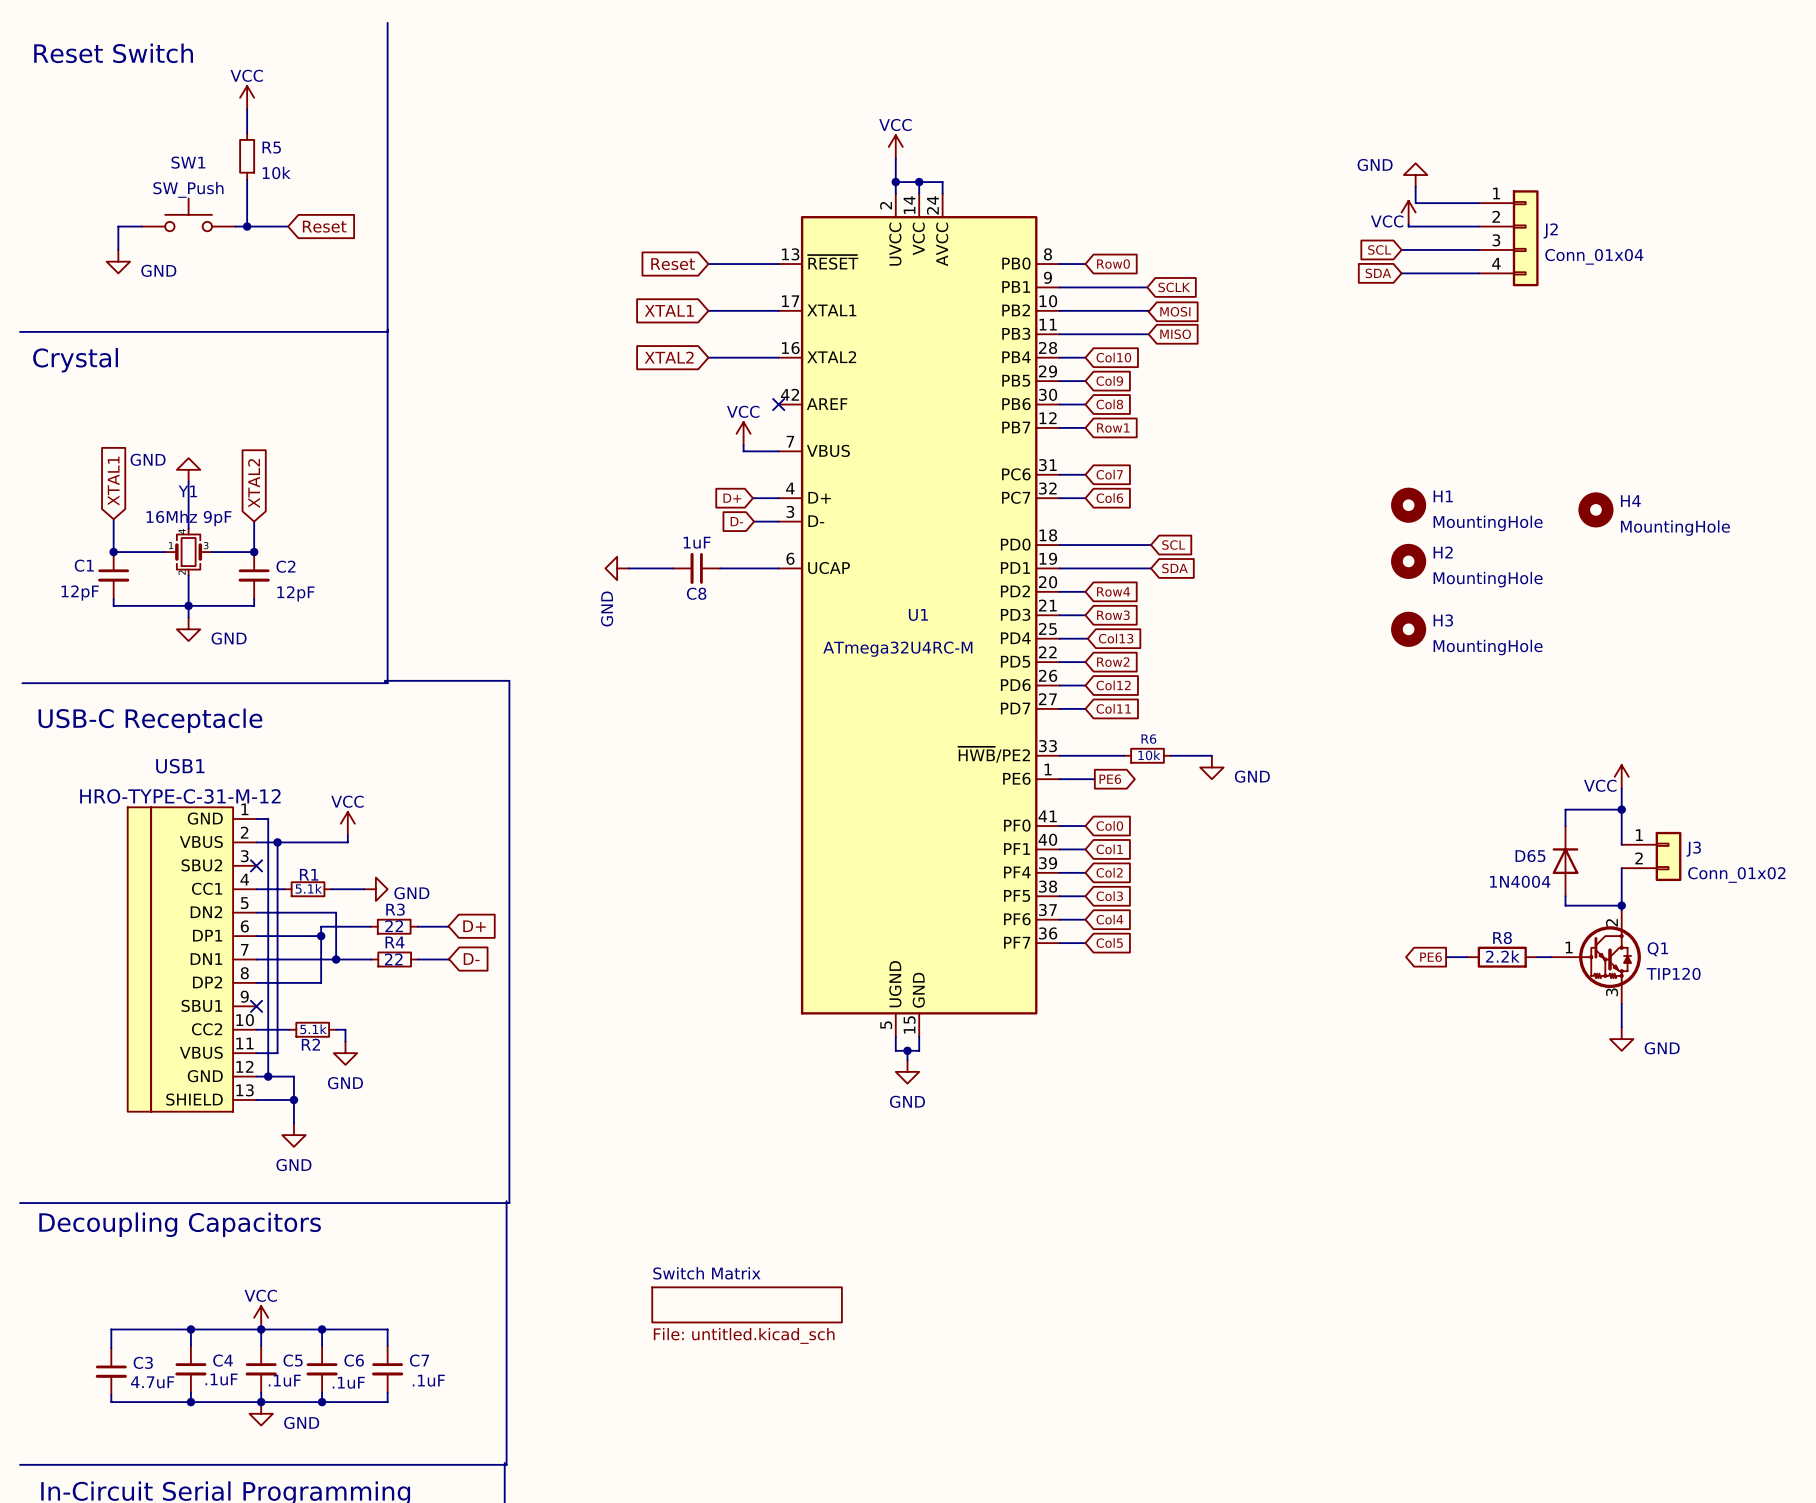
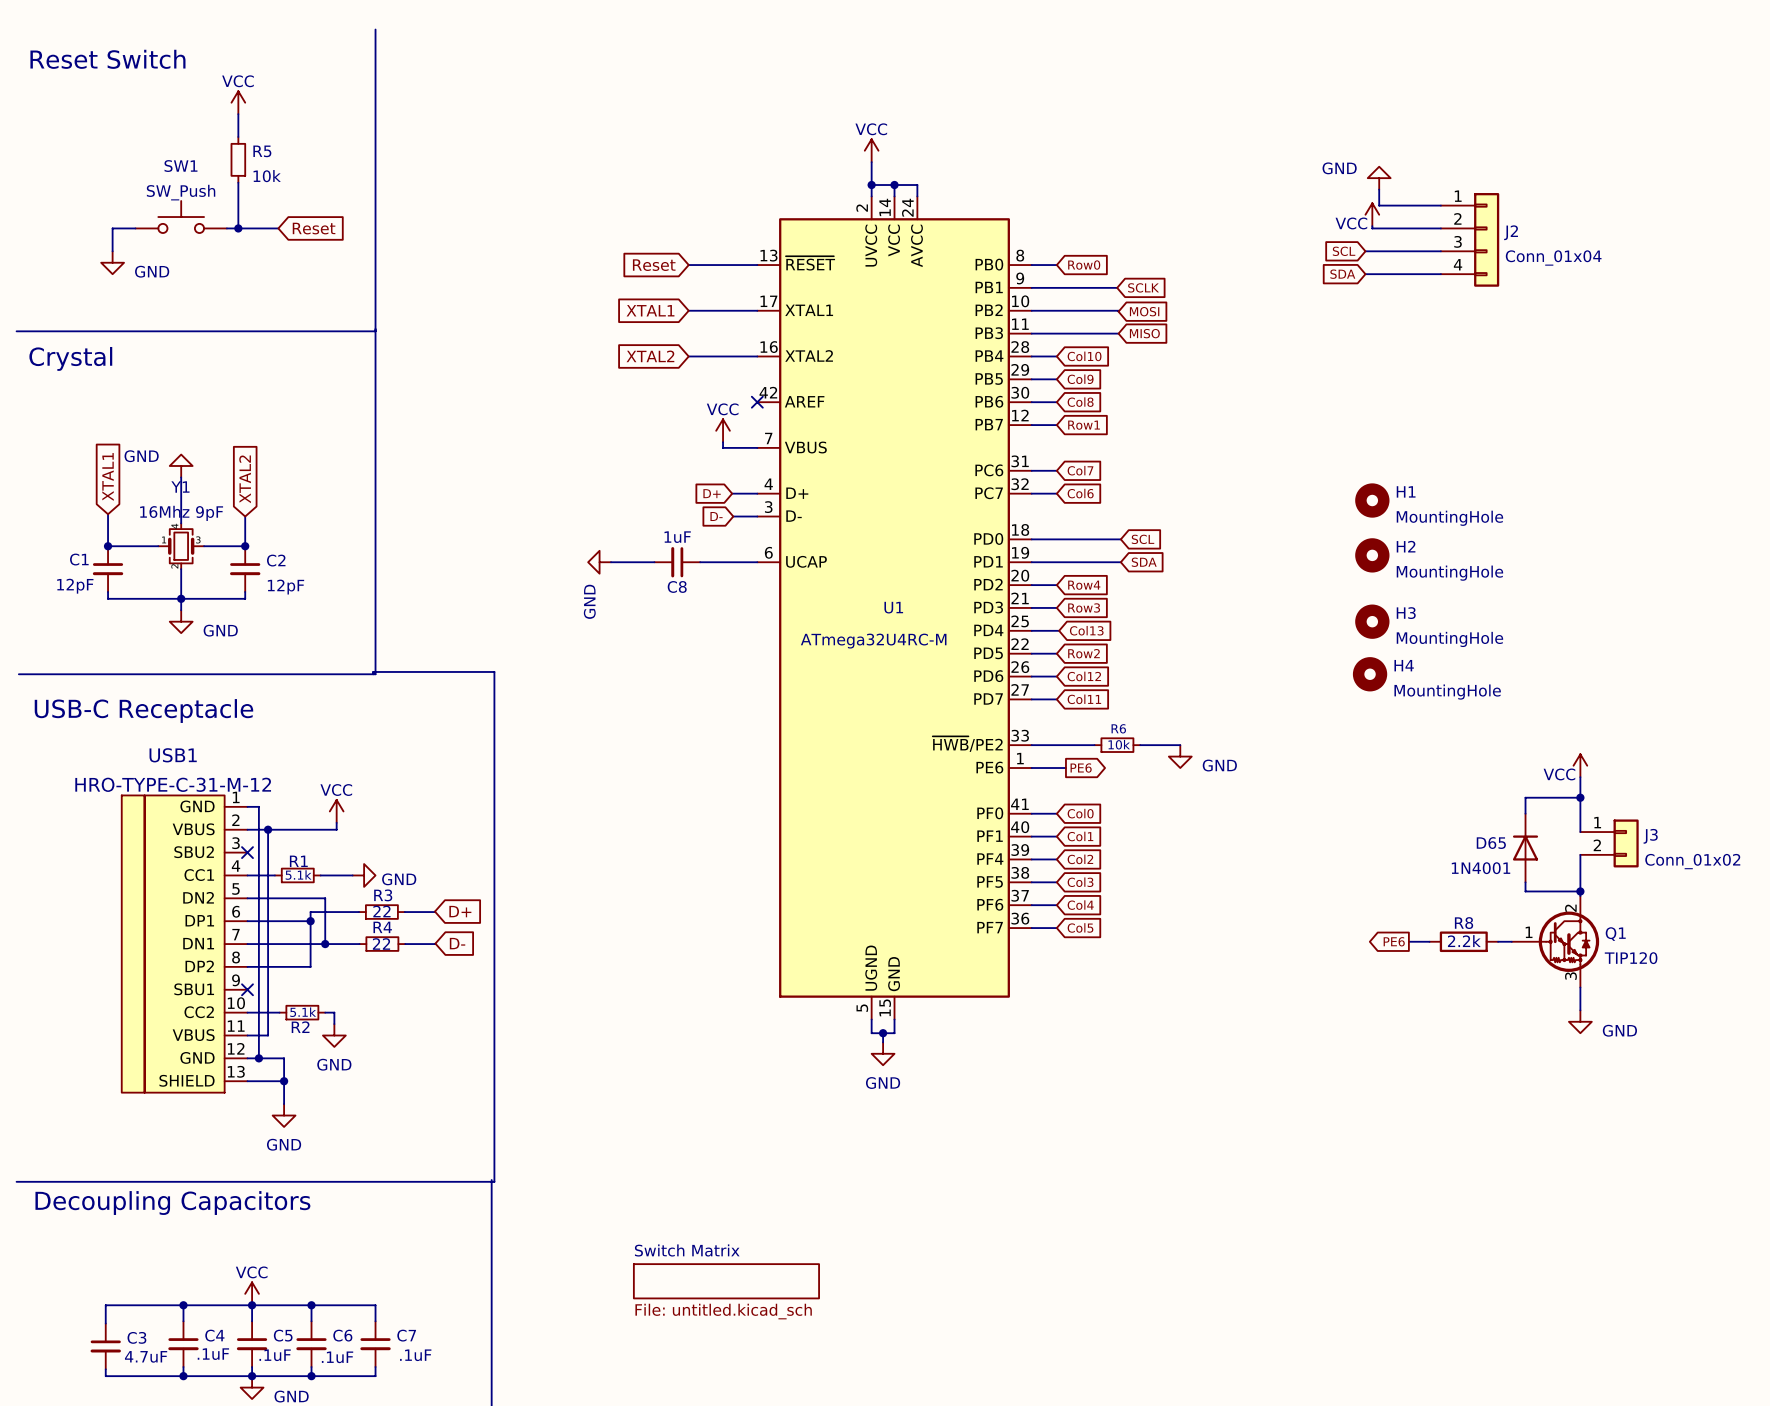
H4 position: (1595, 509) -> (1370, 674)
D65 value: 1N4004 (1520, 881) -> 1N4001 (1481, 868)

